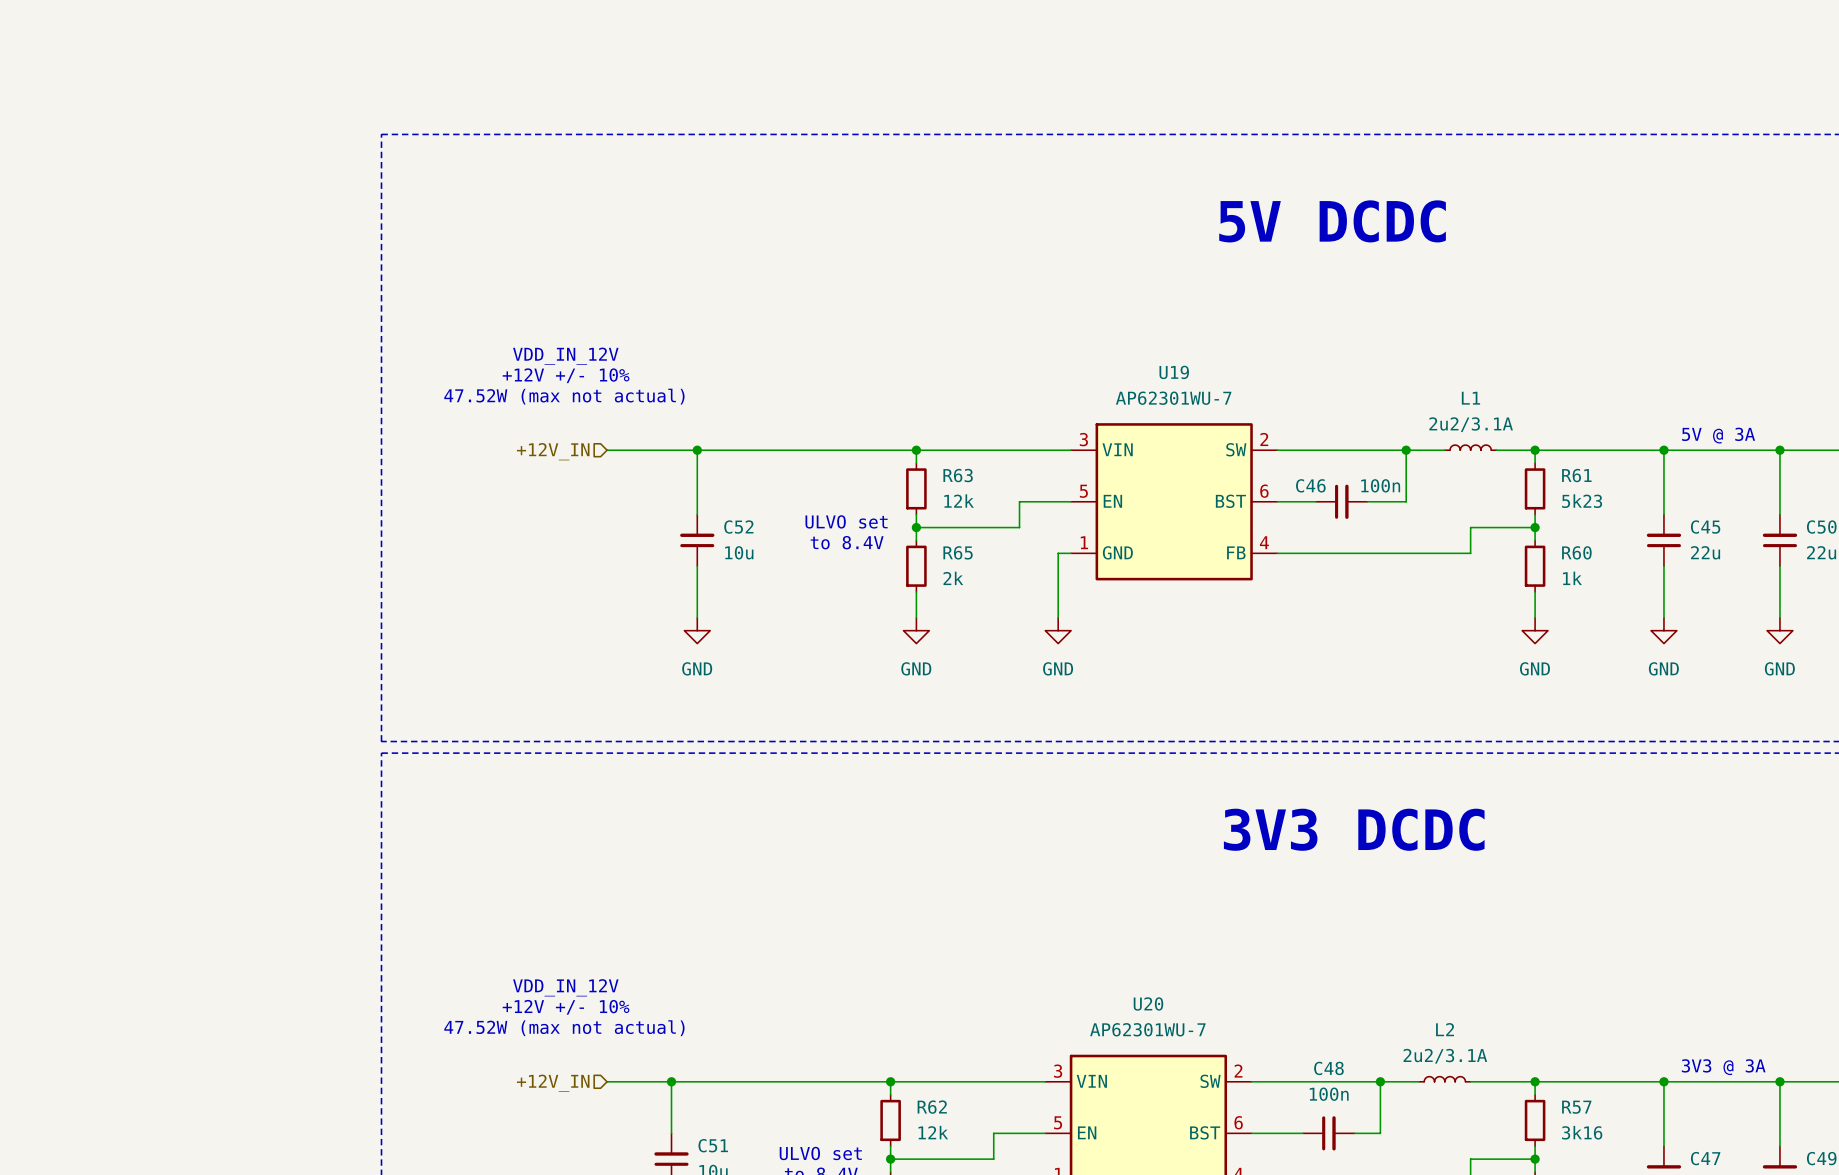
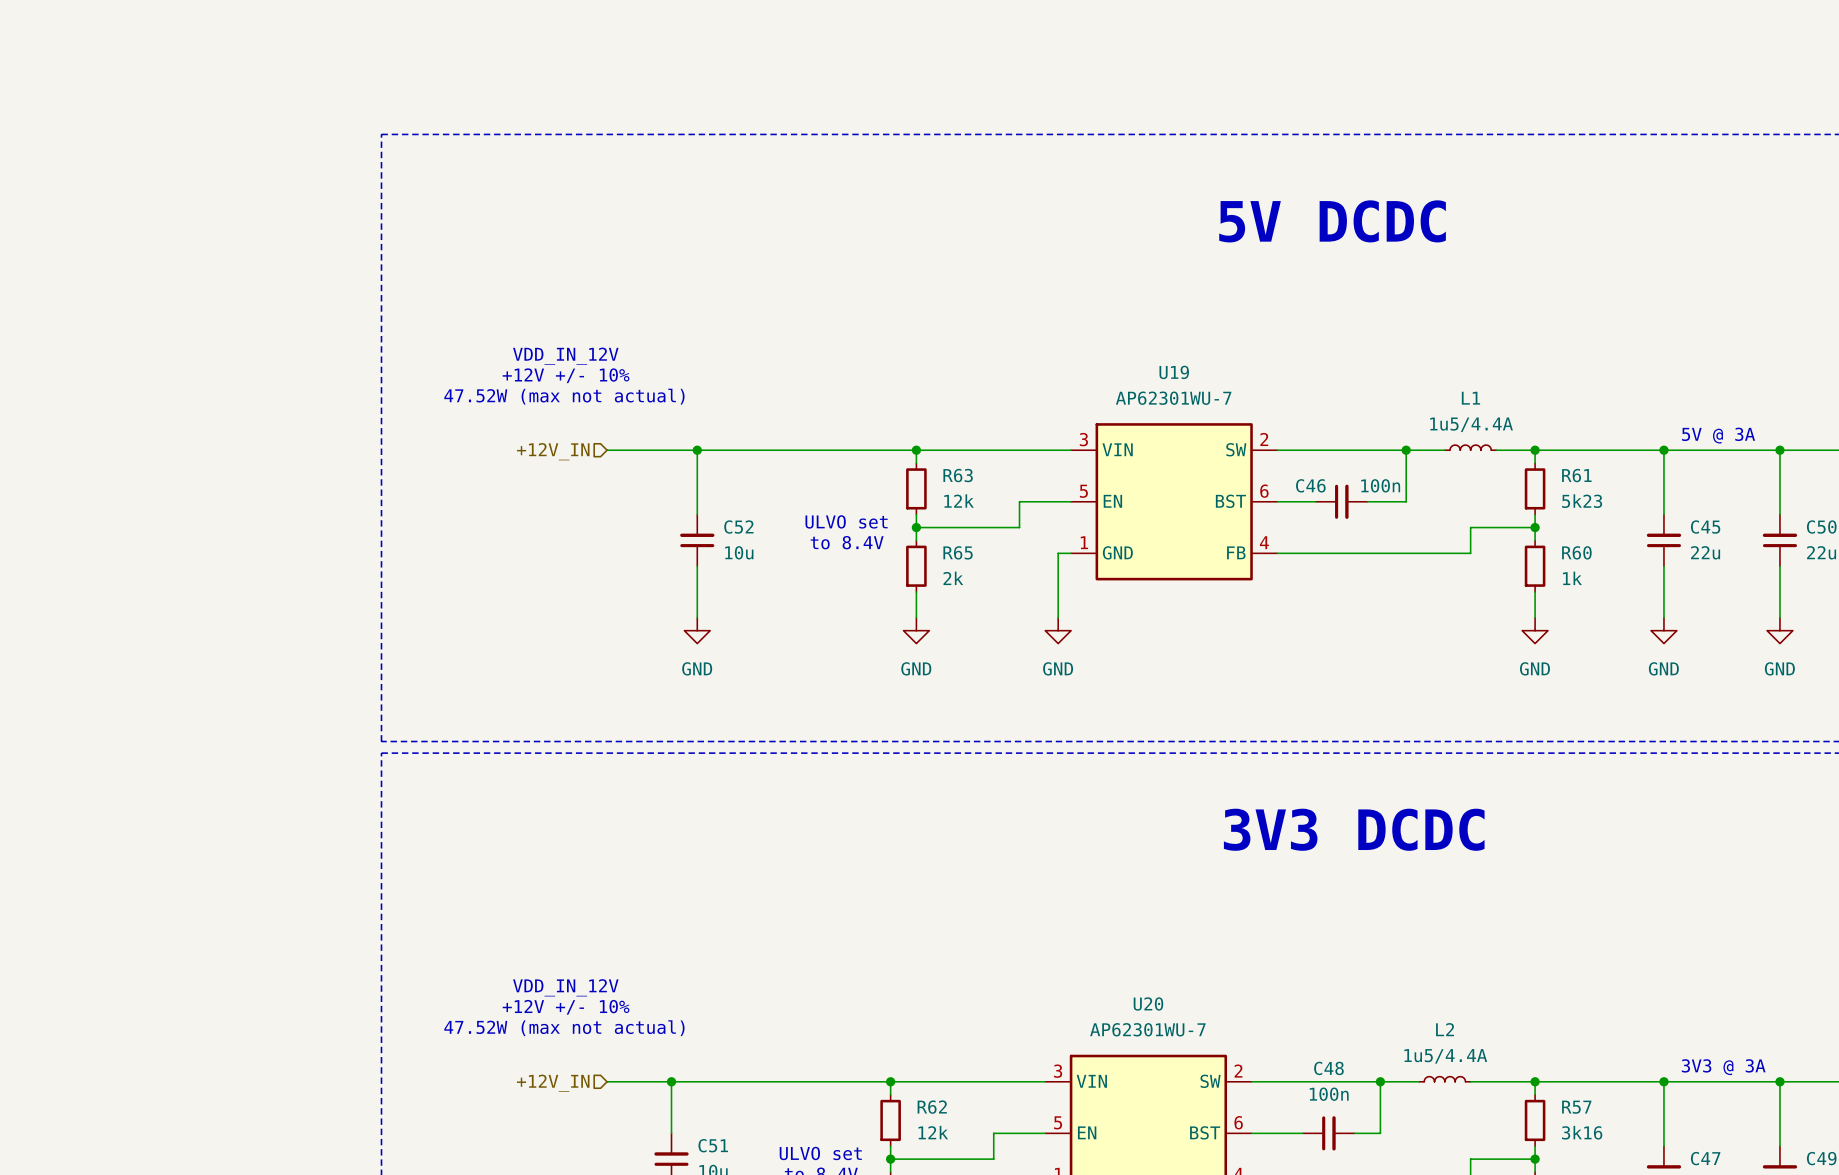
L1 text: 2u2/3.1A (1471, 424) -> 1u5/4.4A (1471, 424)
L2 text: 2u2/3.1A (1445, 1056) -> 1u5/4.4A (1445, 1056)

